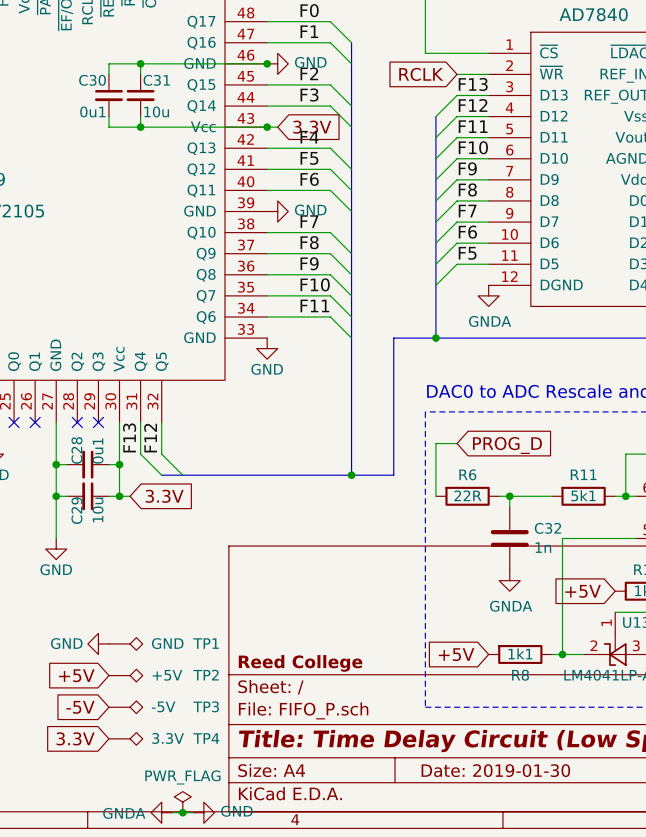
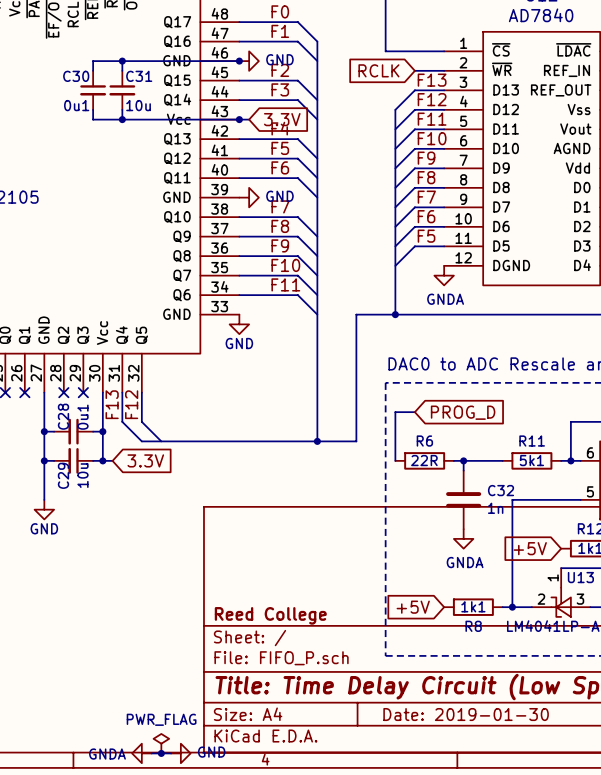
power symbol: GND (98, 643) -> none
TP1: GND (125, 643) -> none
global label: +5V (76, 675) -> none
TP2: +5V (125, 675) -> none
global label: -5V (80, 707) -> none
TP3: -5V (125, 707) -> none
global label: 3.3V (75, 738) -> none
TP4: 3.3V (125, 738) -> none

